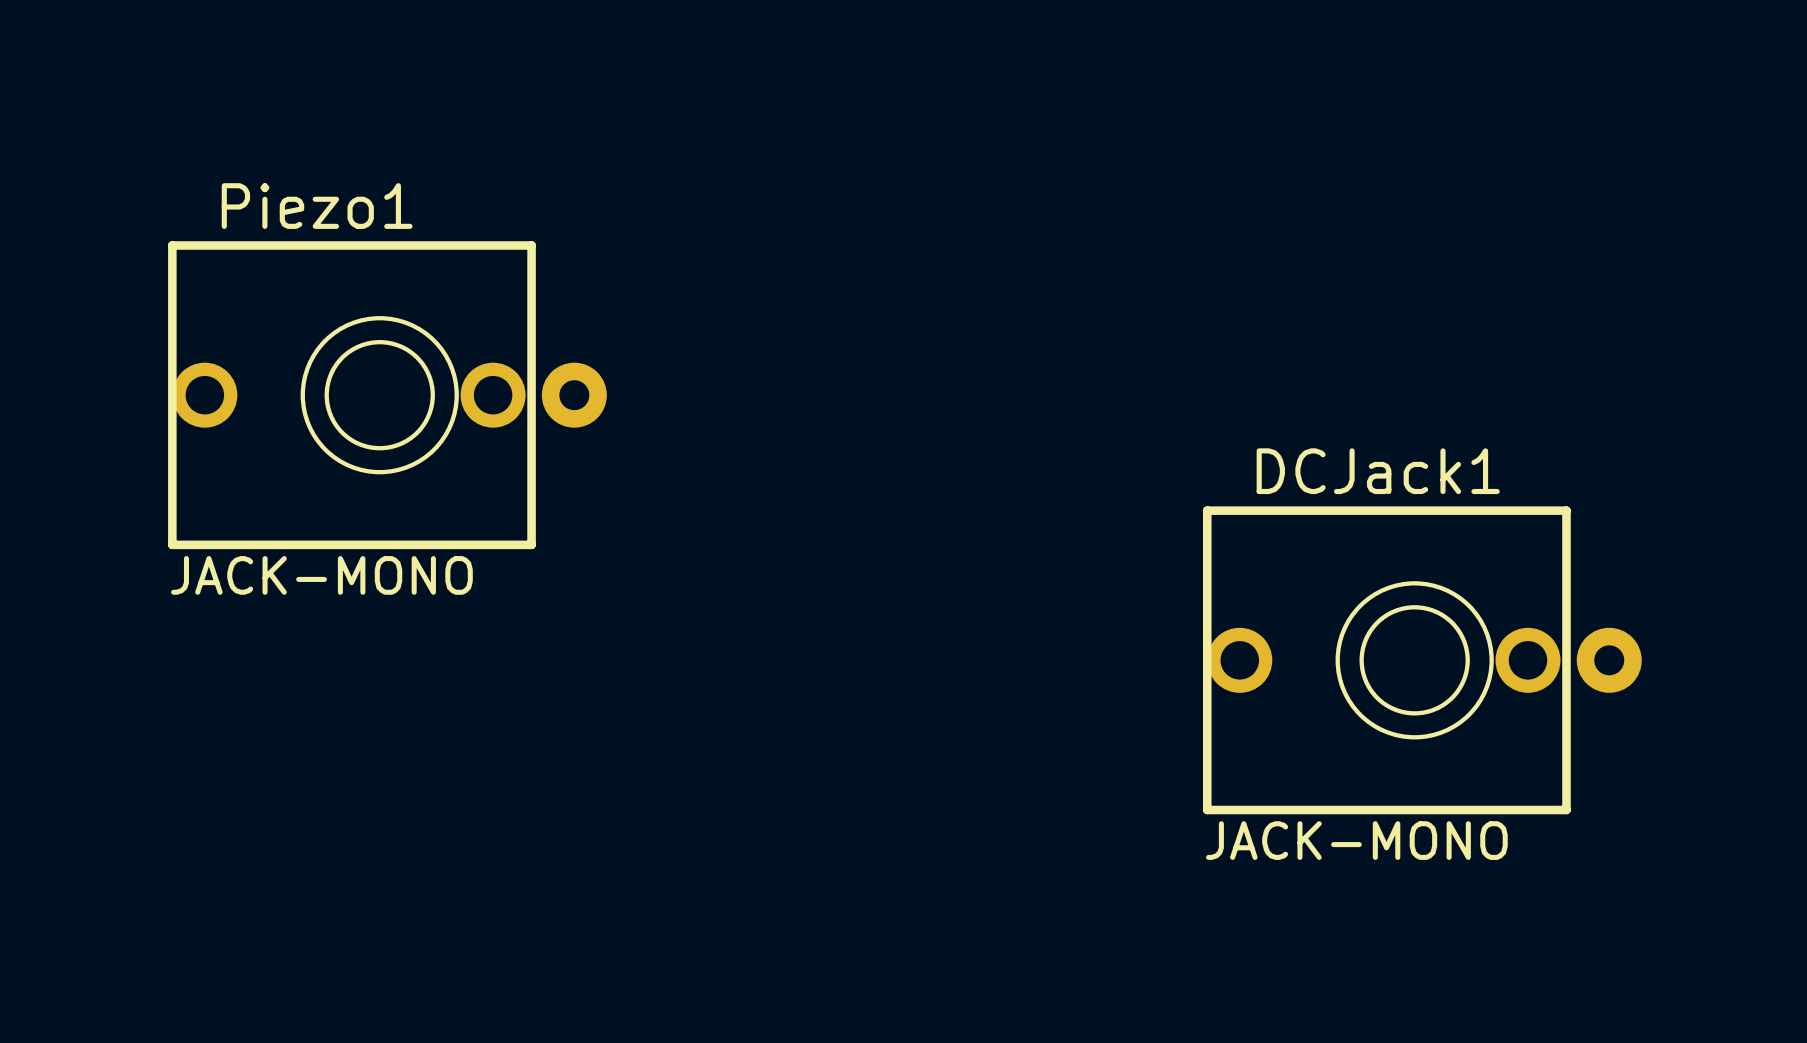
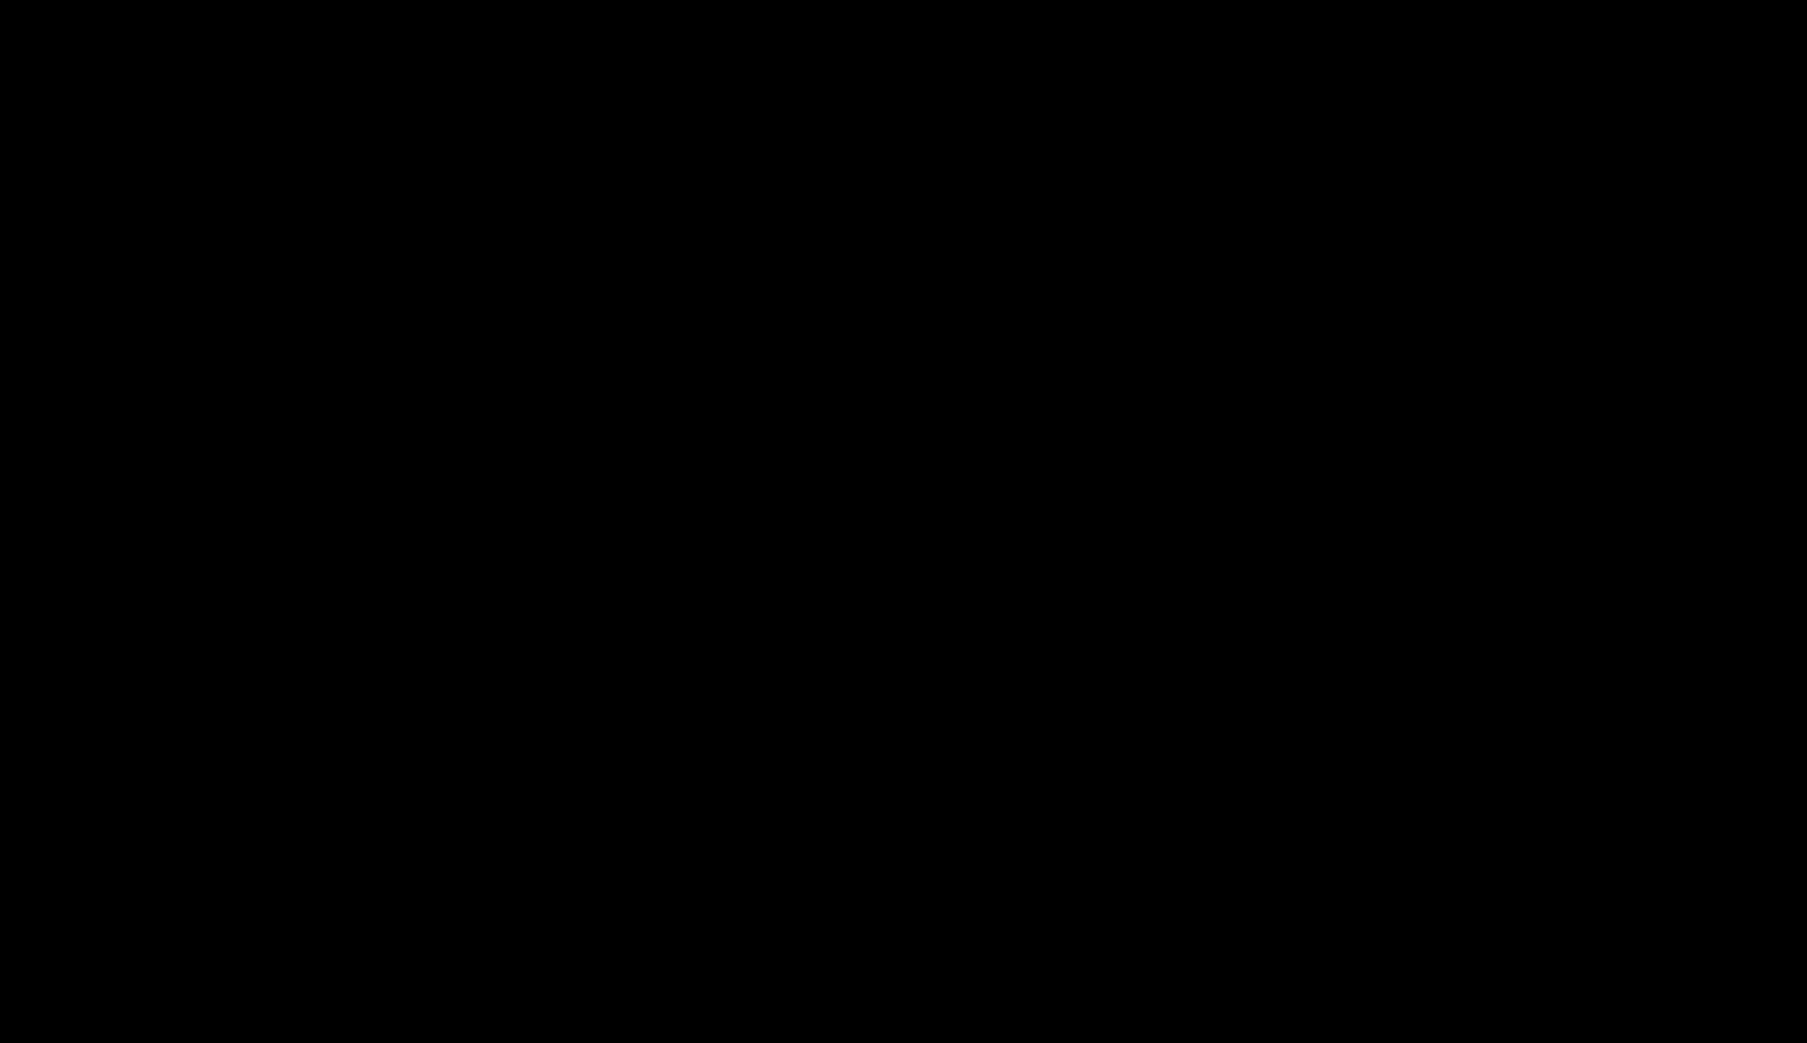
Piezo1: JACK-MONO (387, 395) -> none
DCJack1: JACK-MONO (1422, 660) -> none

